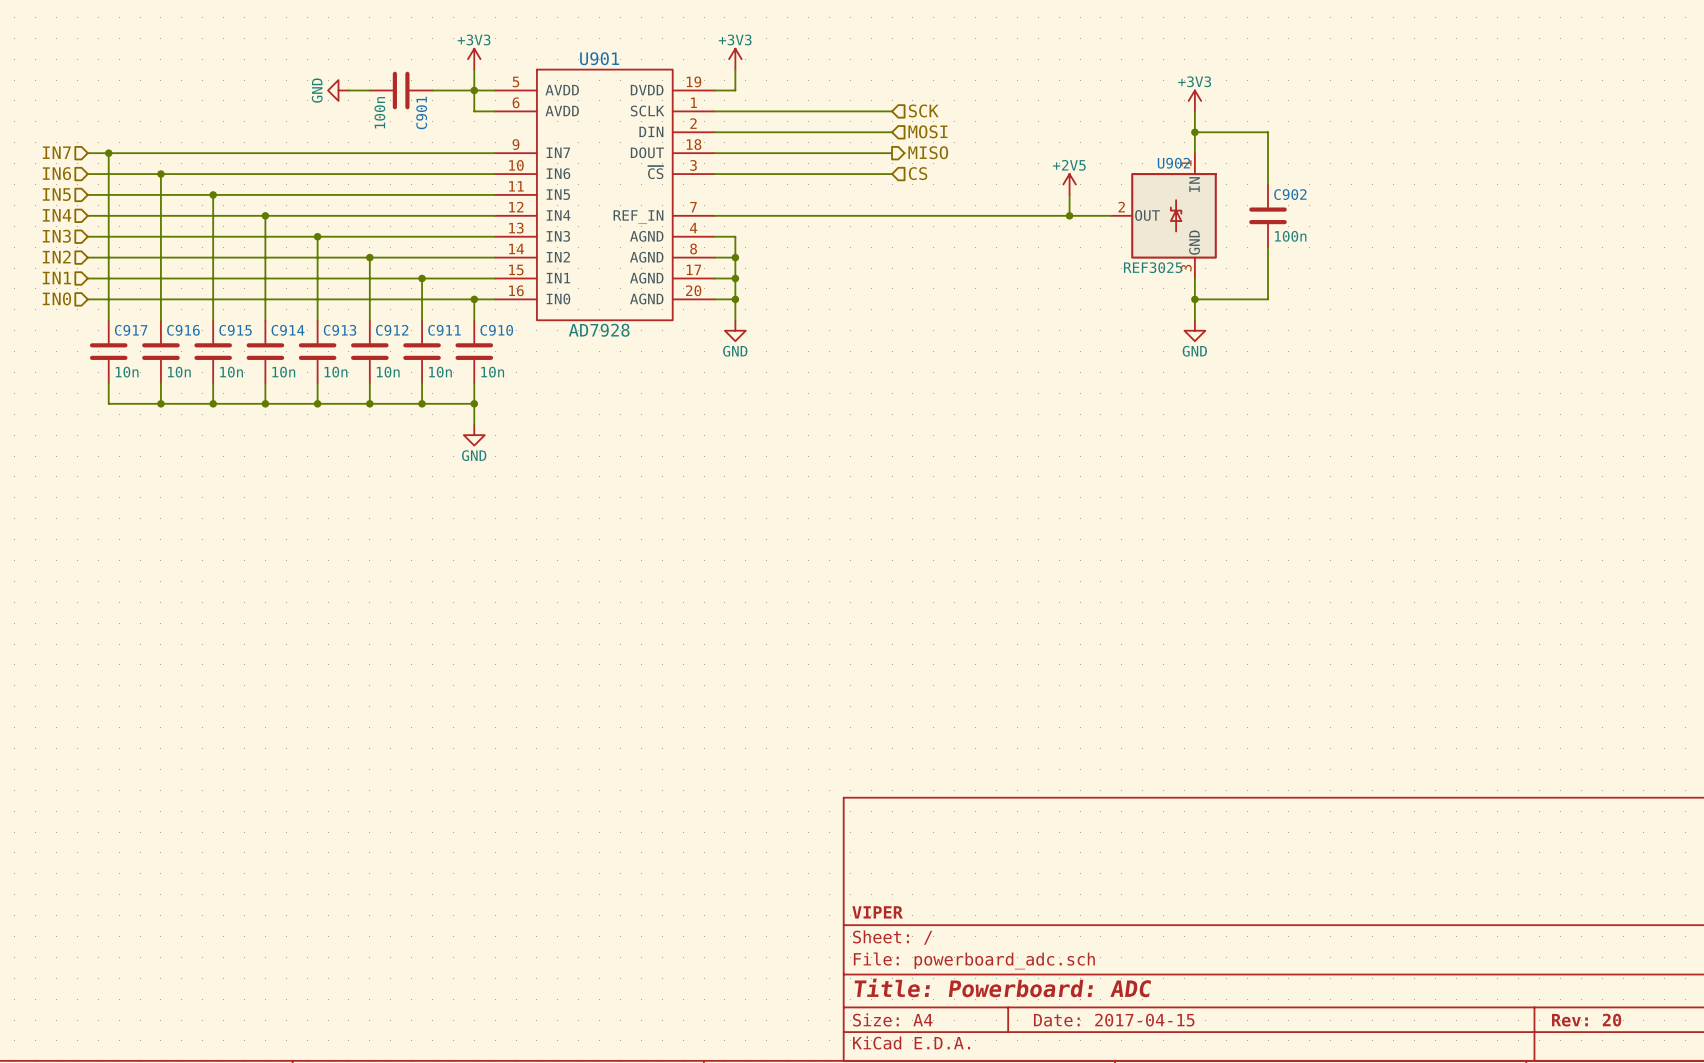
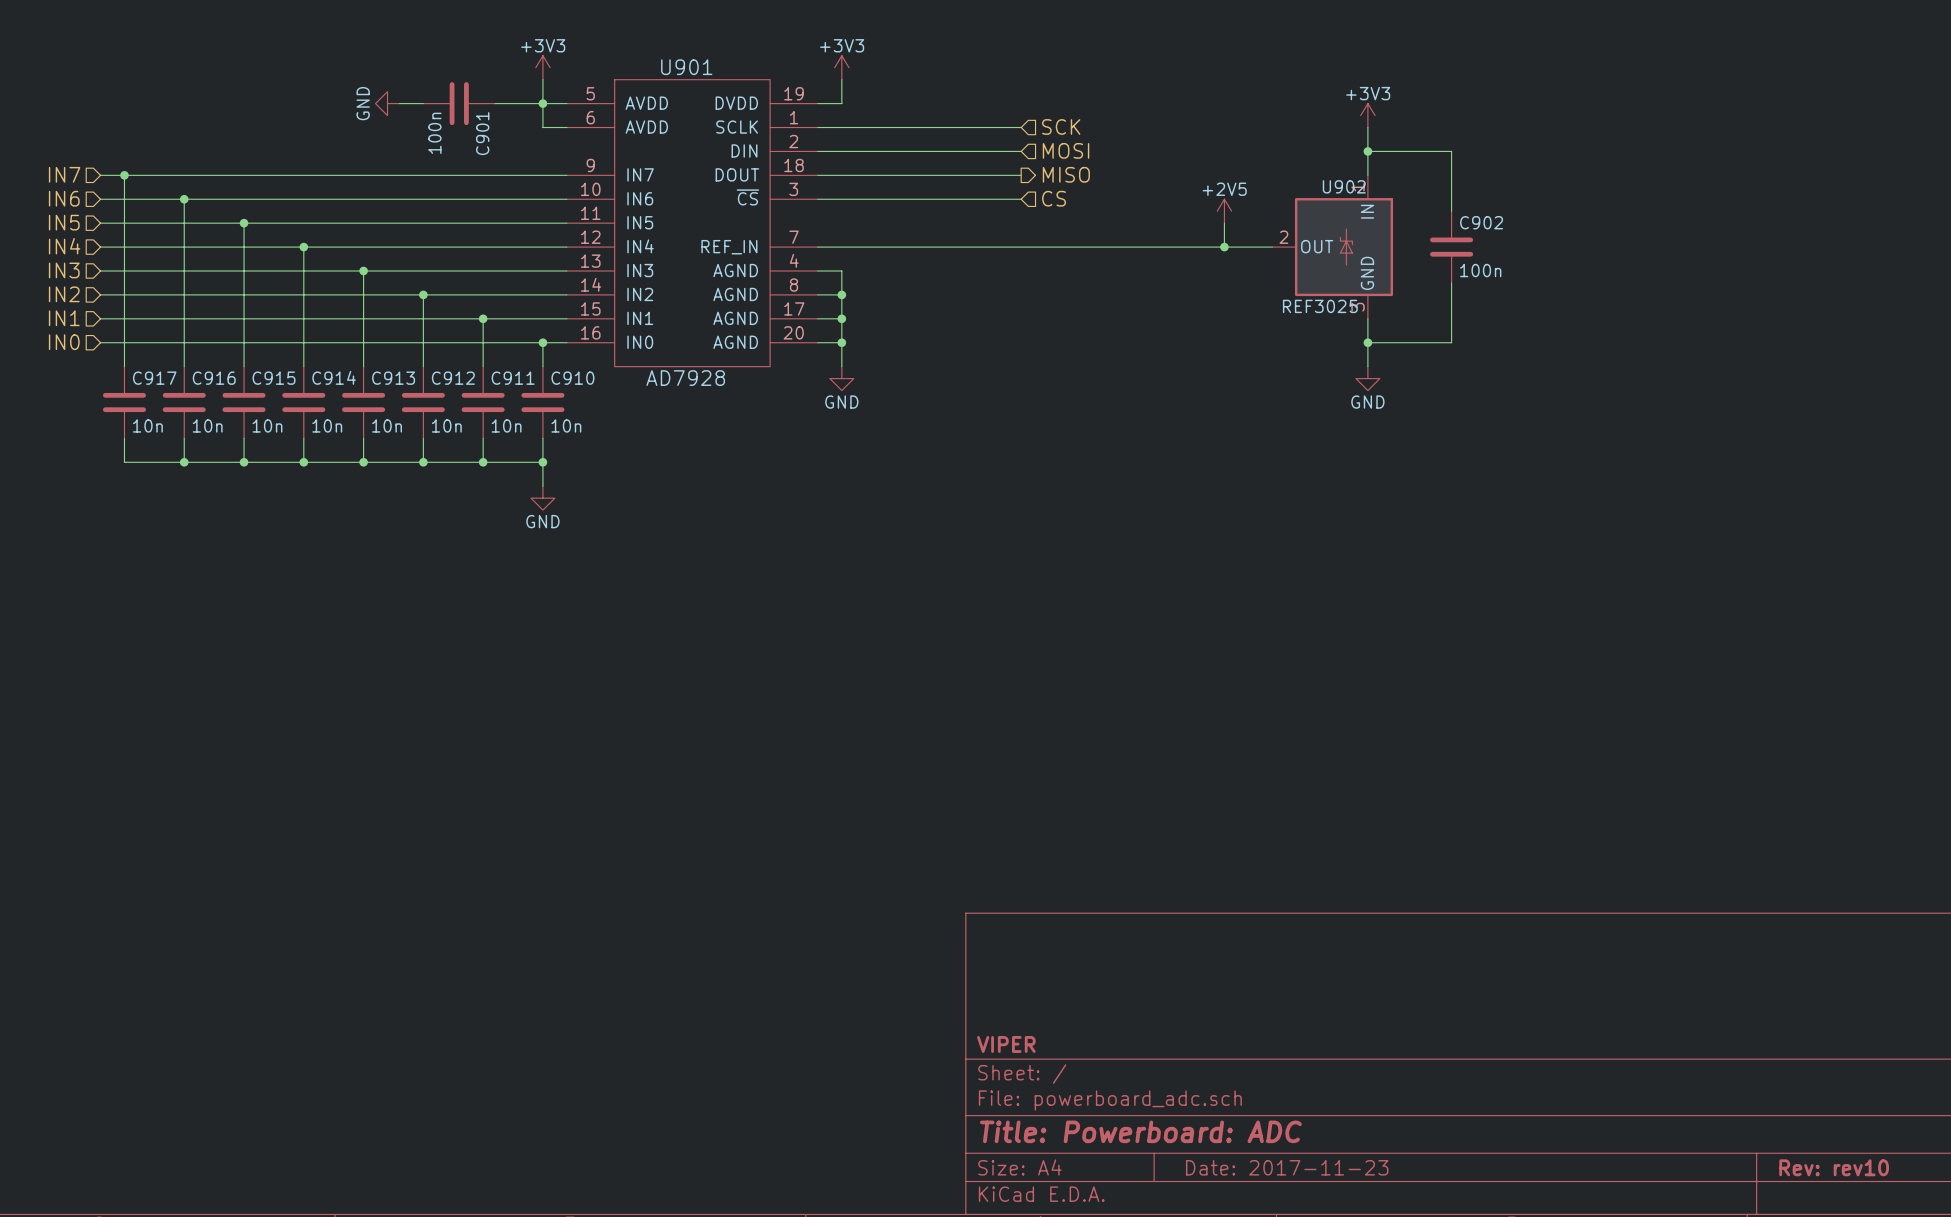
title block: Date: 2017-04-15 (1114, 1020) -> Date: 2017-11-23 (1287, 1167)
title block: Rev: 20 (1586, 1020) -> Rev: rev10 (1834, 1167)

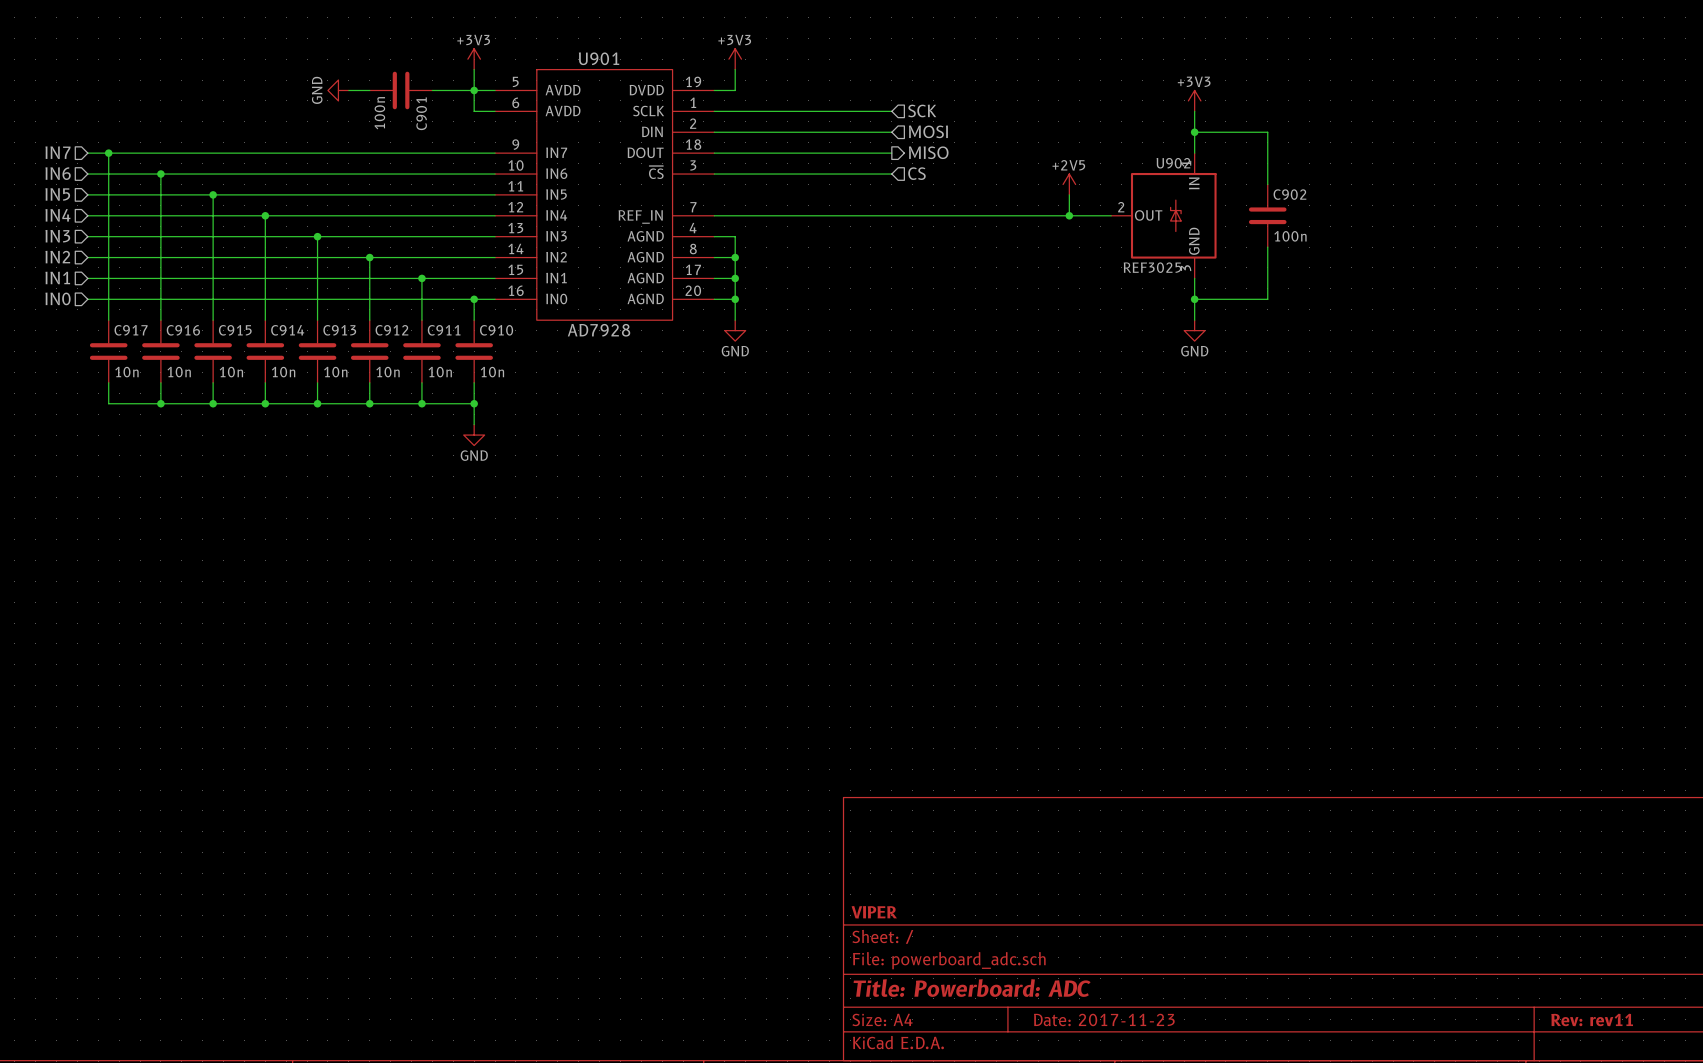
title block: Rev: rev10 (1834, 1167) -> Rev: rev11 (1592, 1019)

